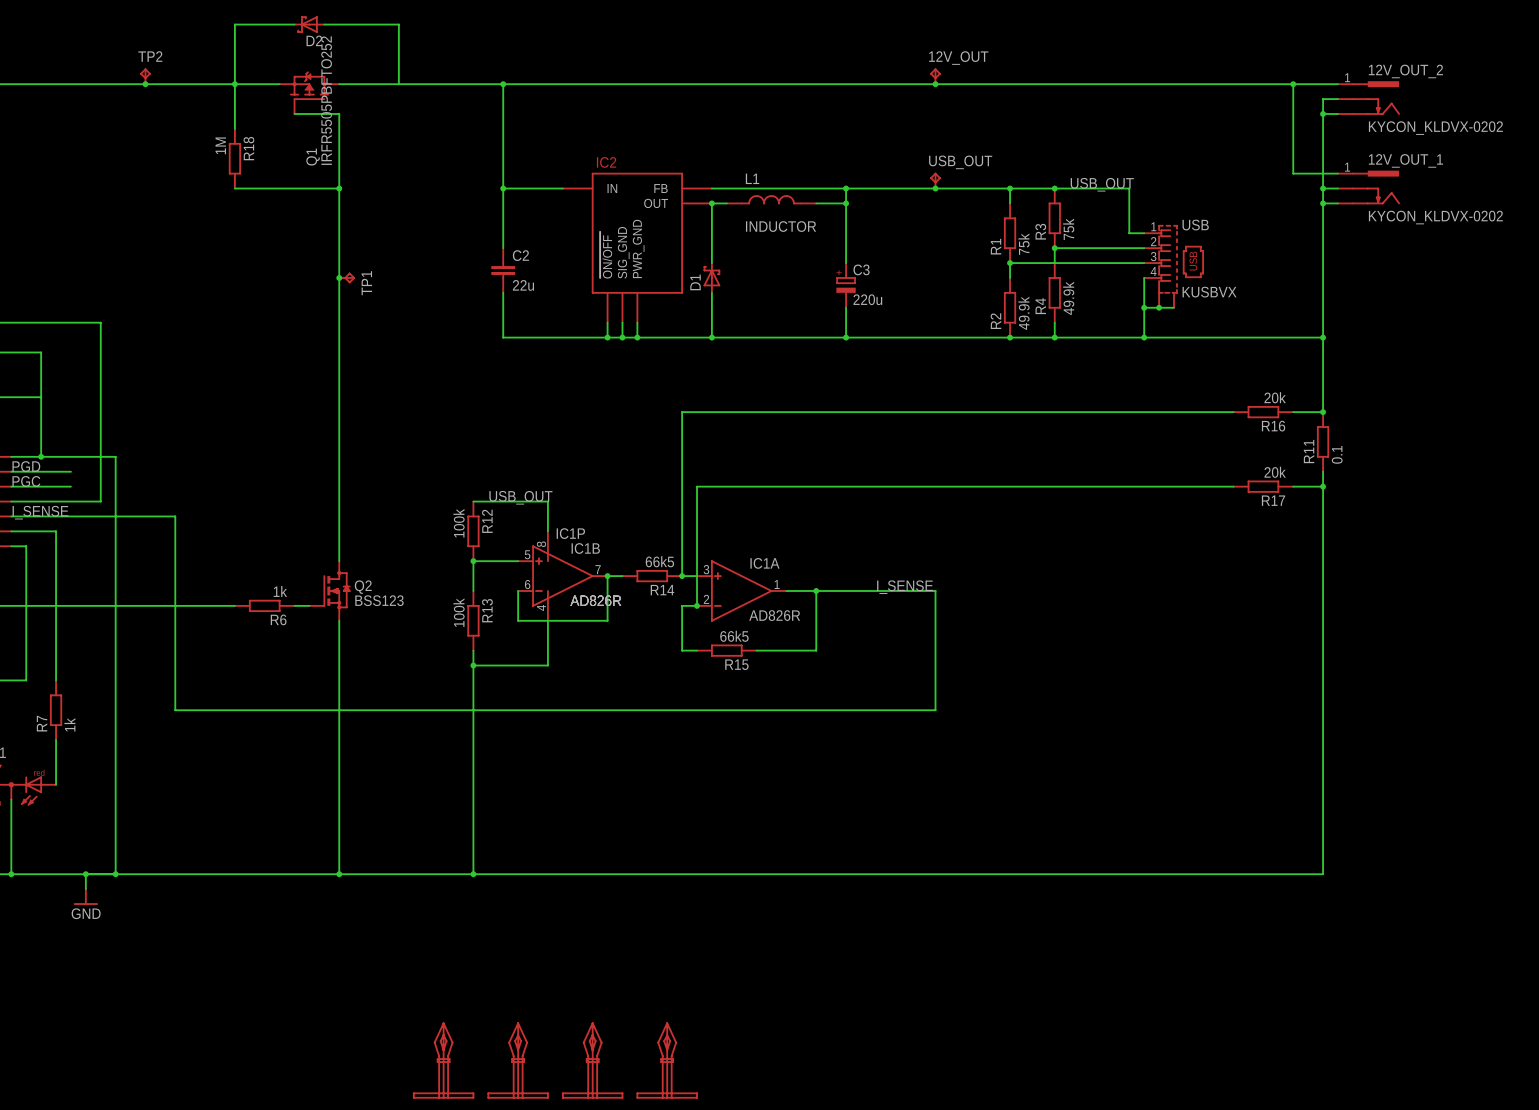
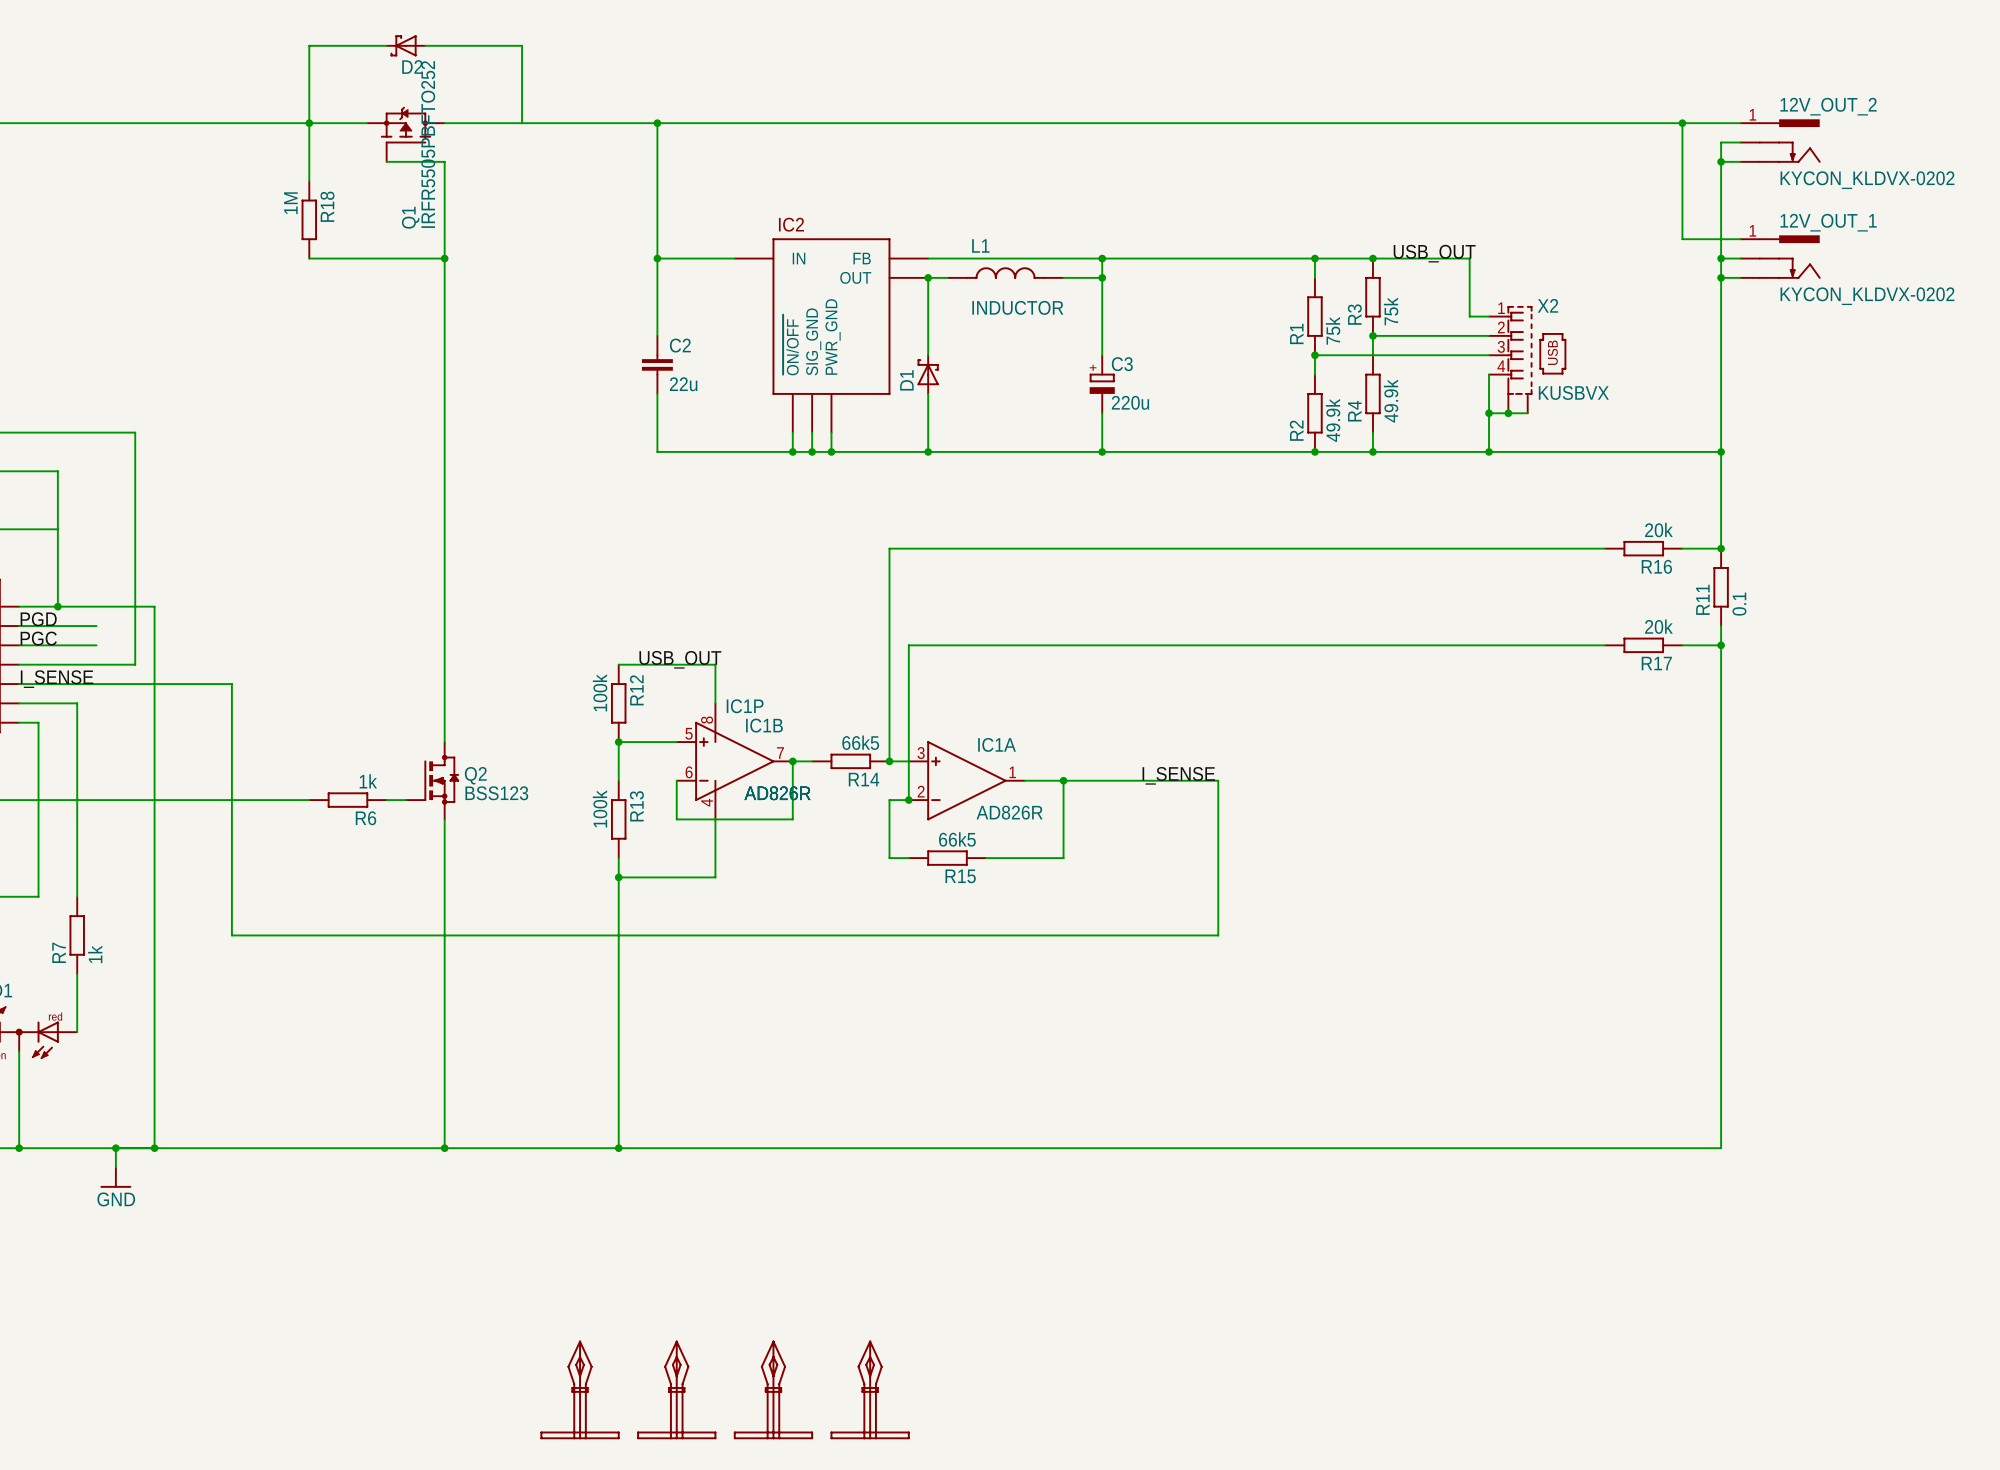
TP2: (145, 76) -> none
12V_OUT: (935, 76) -> none
junction: (145, 84) -> none
junction: (935, 84) -> none
USB_OUT: (935, 180) -> none
junction: (935, 188) -> none
USB name: USB (1195, 225) -> X2 (1547, 305)
junction: (339, 277) -> none
TP1: (347, 277) -> none

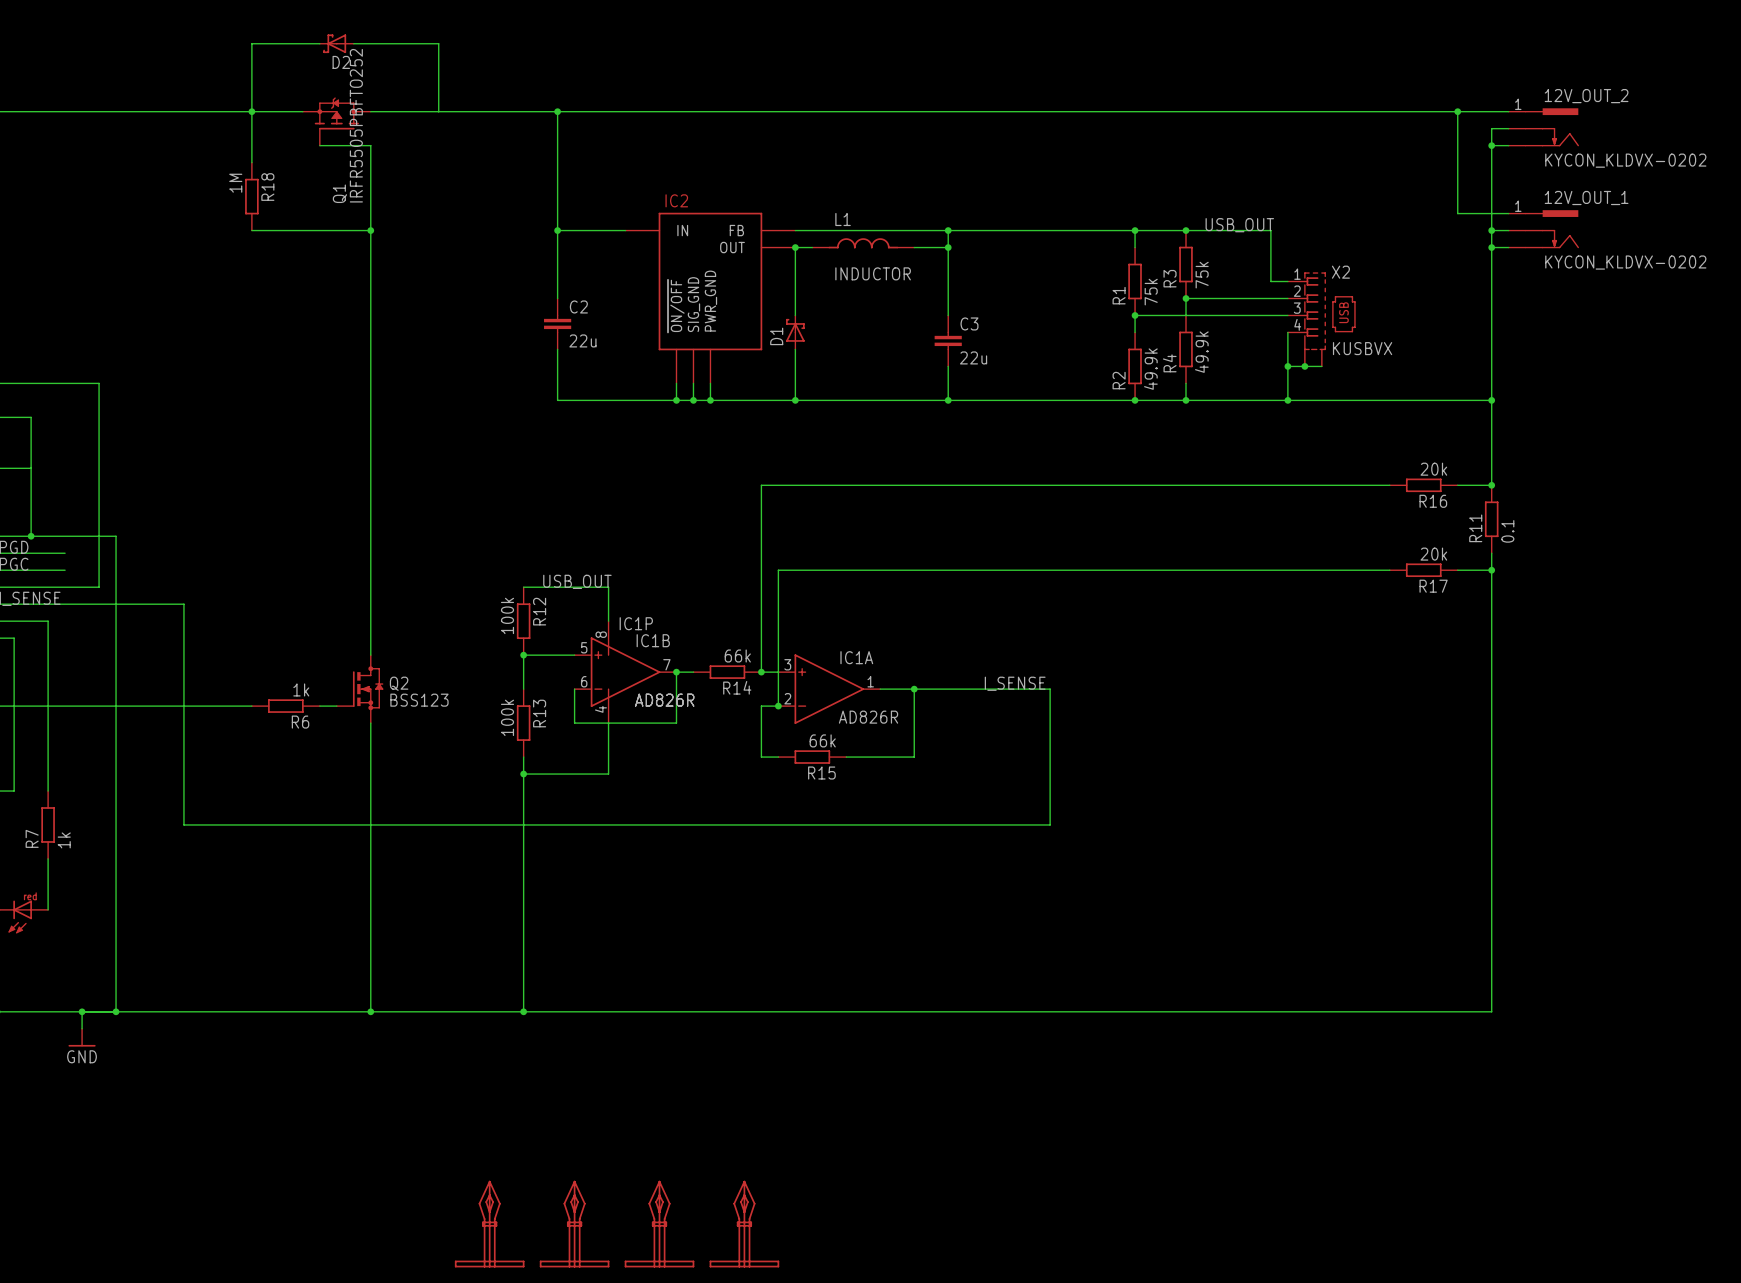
C3 symbol: [1089, 355, 1115, 414] -> [934, 315, 962, 367]
C3 value: 220u (1130, 402) -> 22u (973, 357)
R14 value: 66k5 (860, 742) -> 66k (737, 656)
R15 value: 66k5 (957, 839) -> 66k (822, 740)

